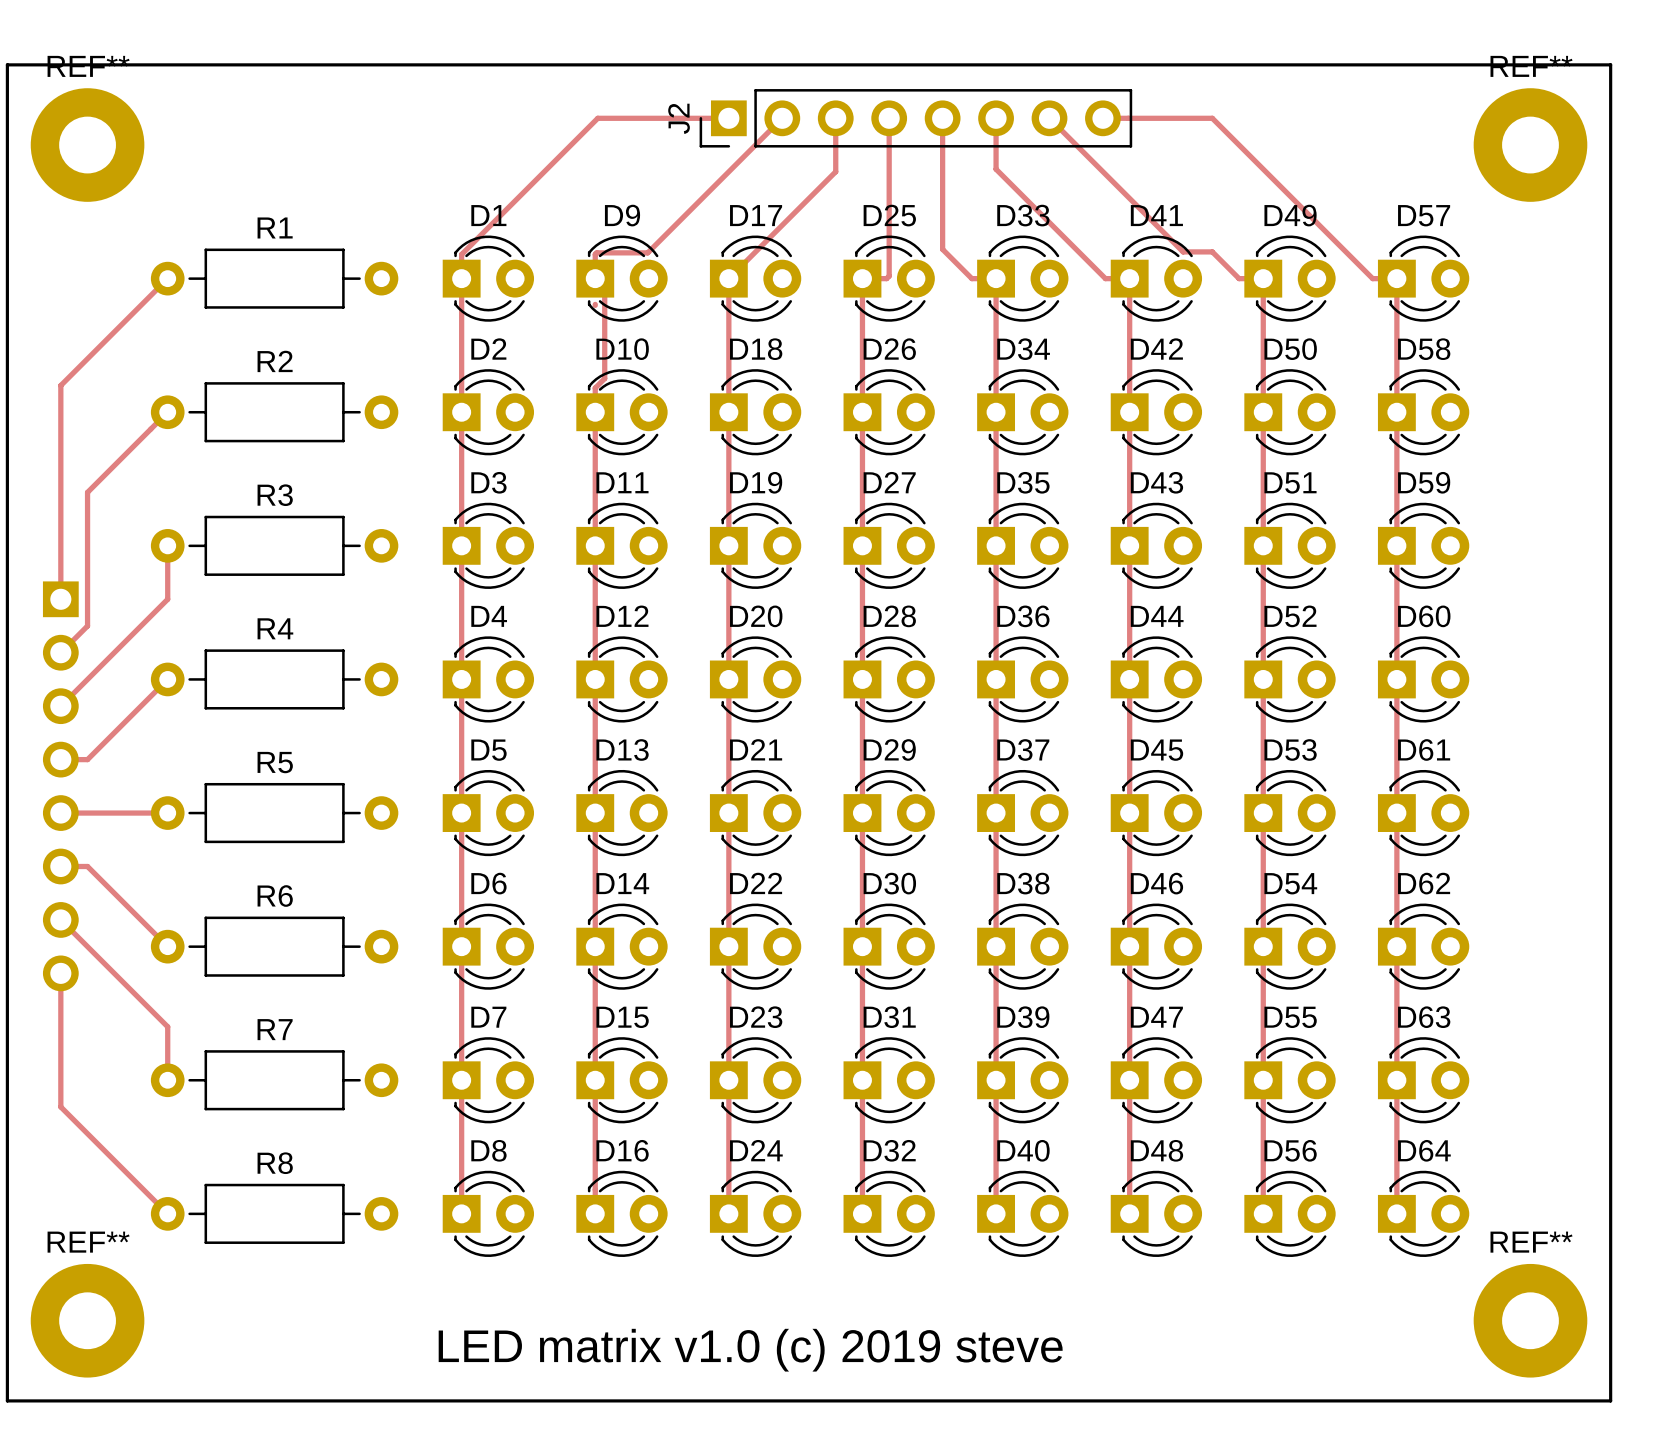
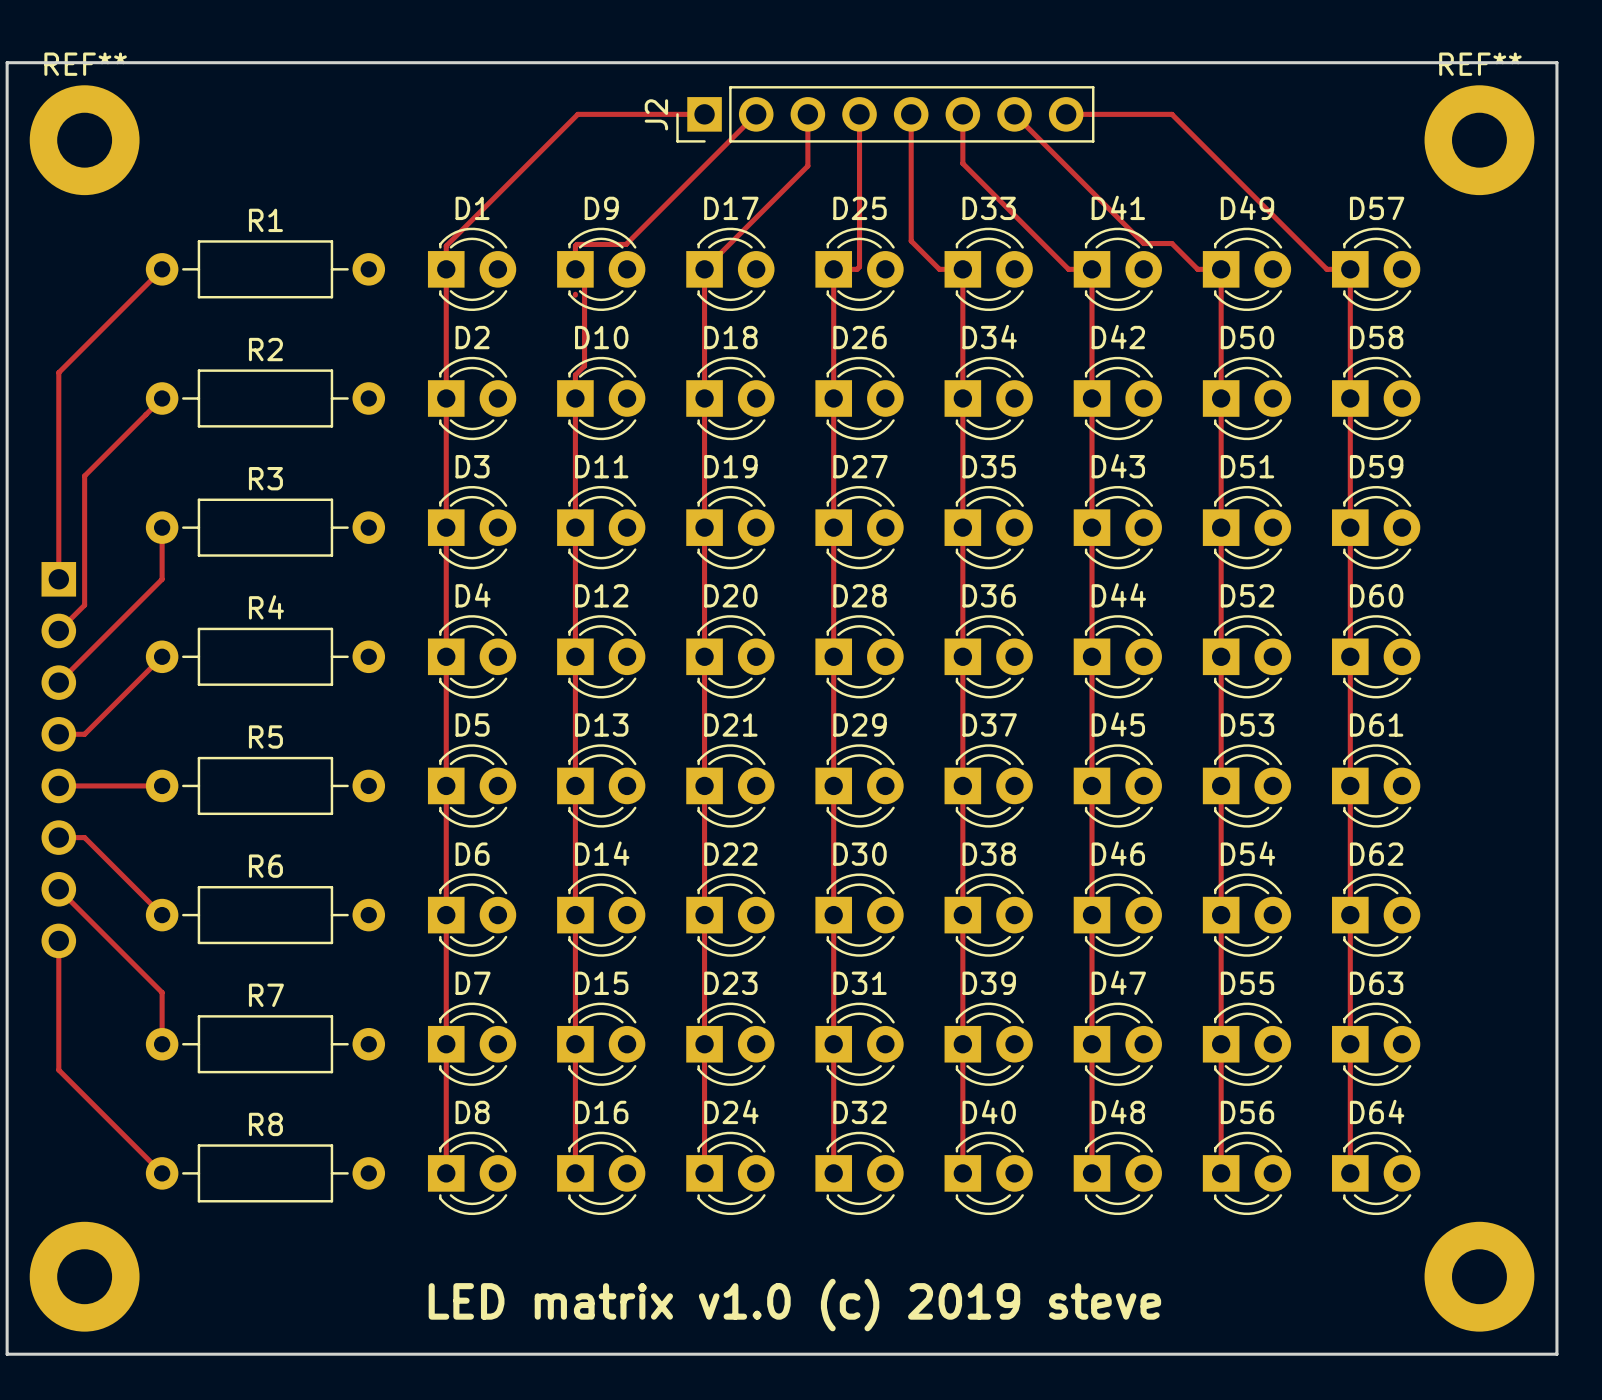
REF** name: REF** (88, 1242) -> none
REF** name: REF** (1531, 1242) -> none

